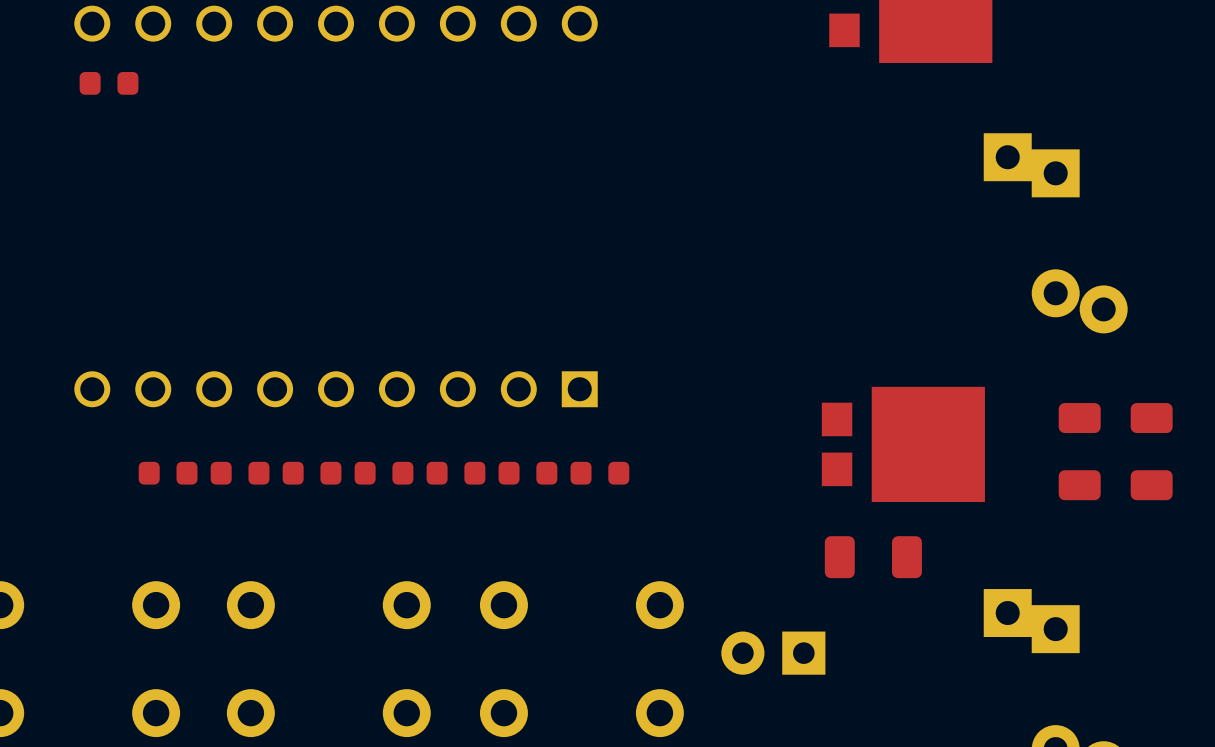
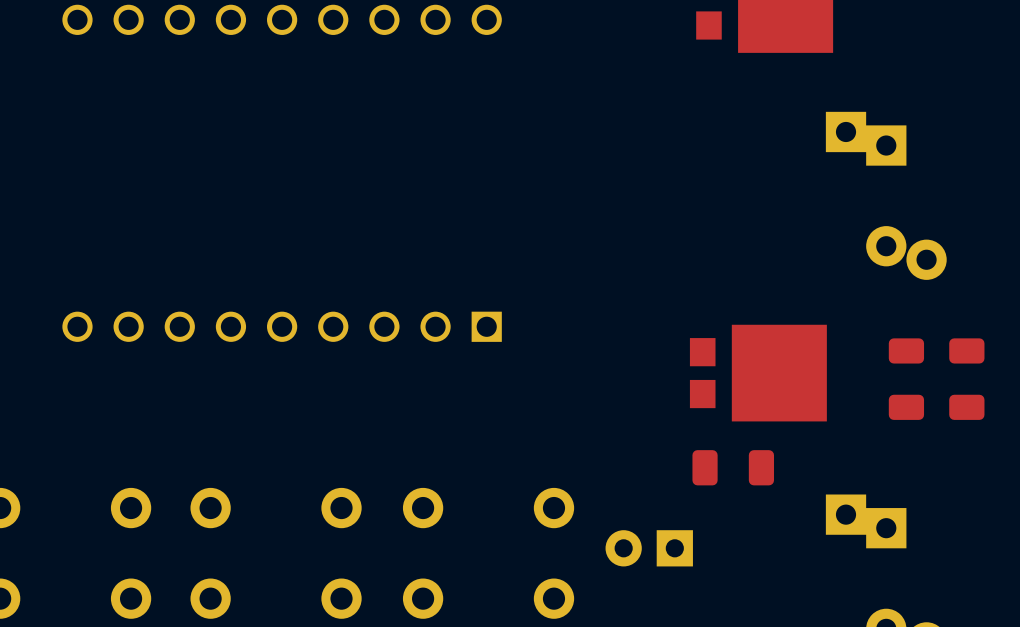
part: (109, 83) -> none
part: (168, 473) -> none
part: (240, 473) -> none
part: (312, 473) -> none
part: (384, 473) -> none
part: (455, 473) -> none
part: (527, 473) -> none
part: (599, 473) -> none

